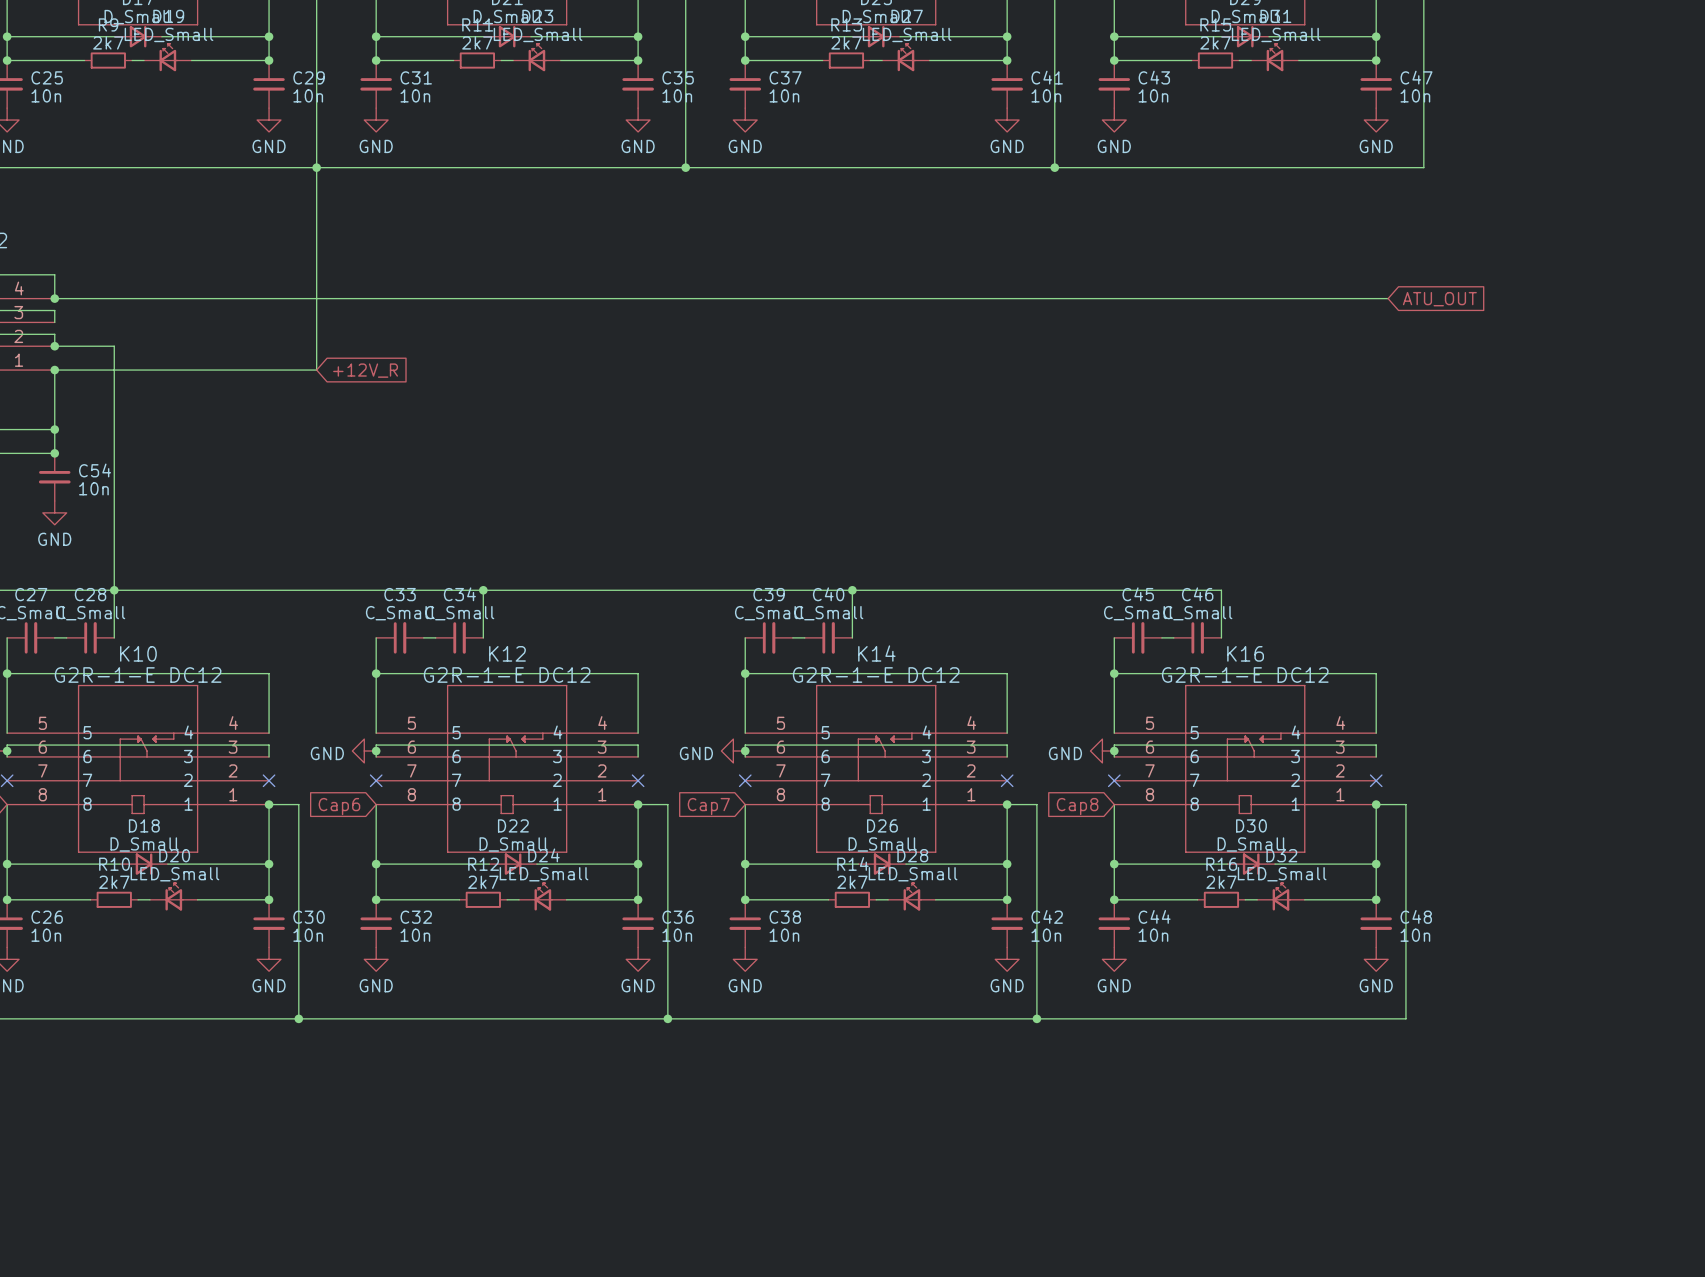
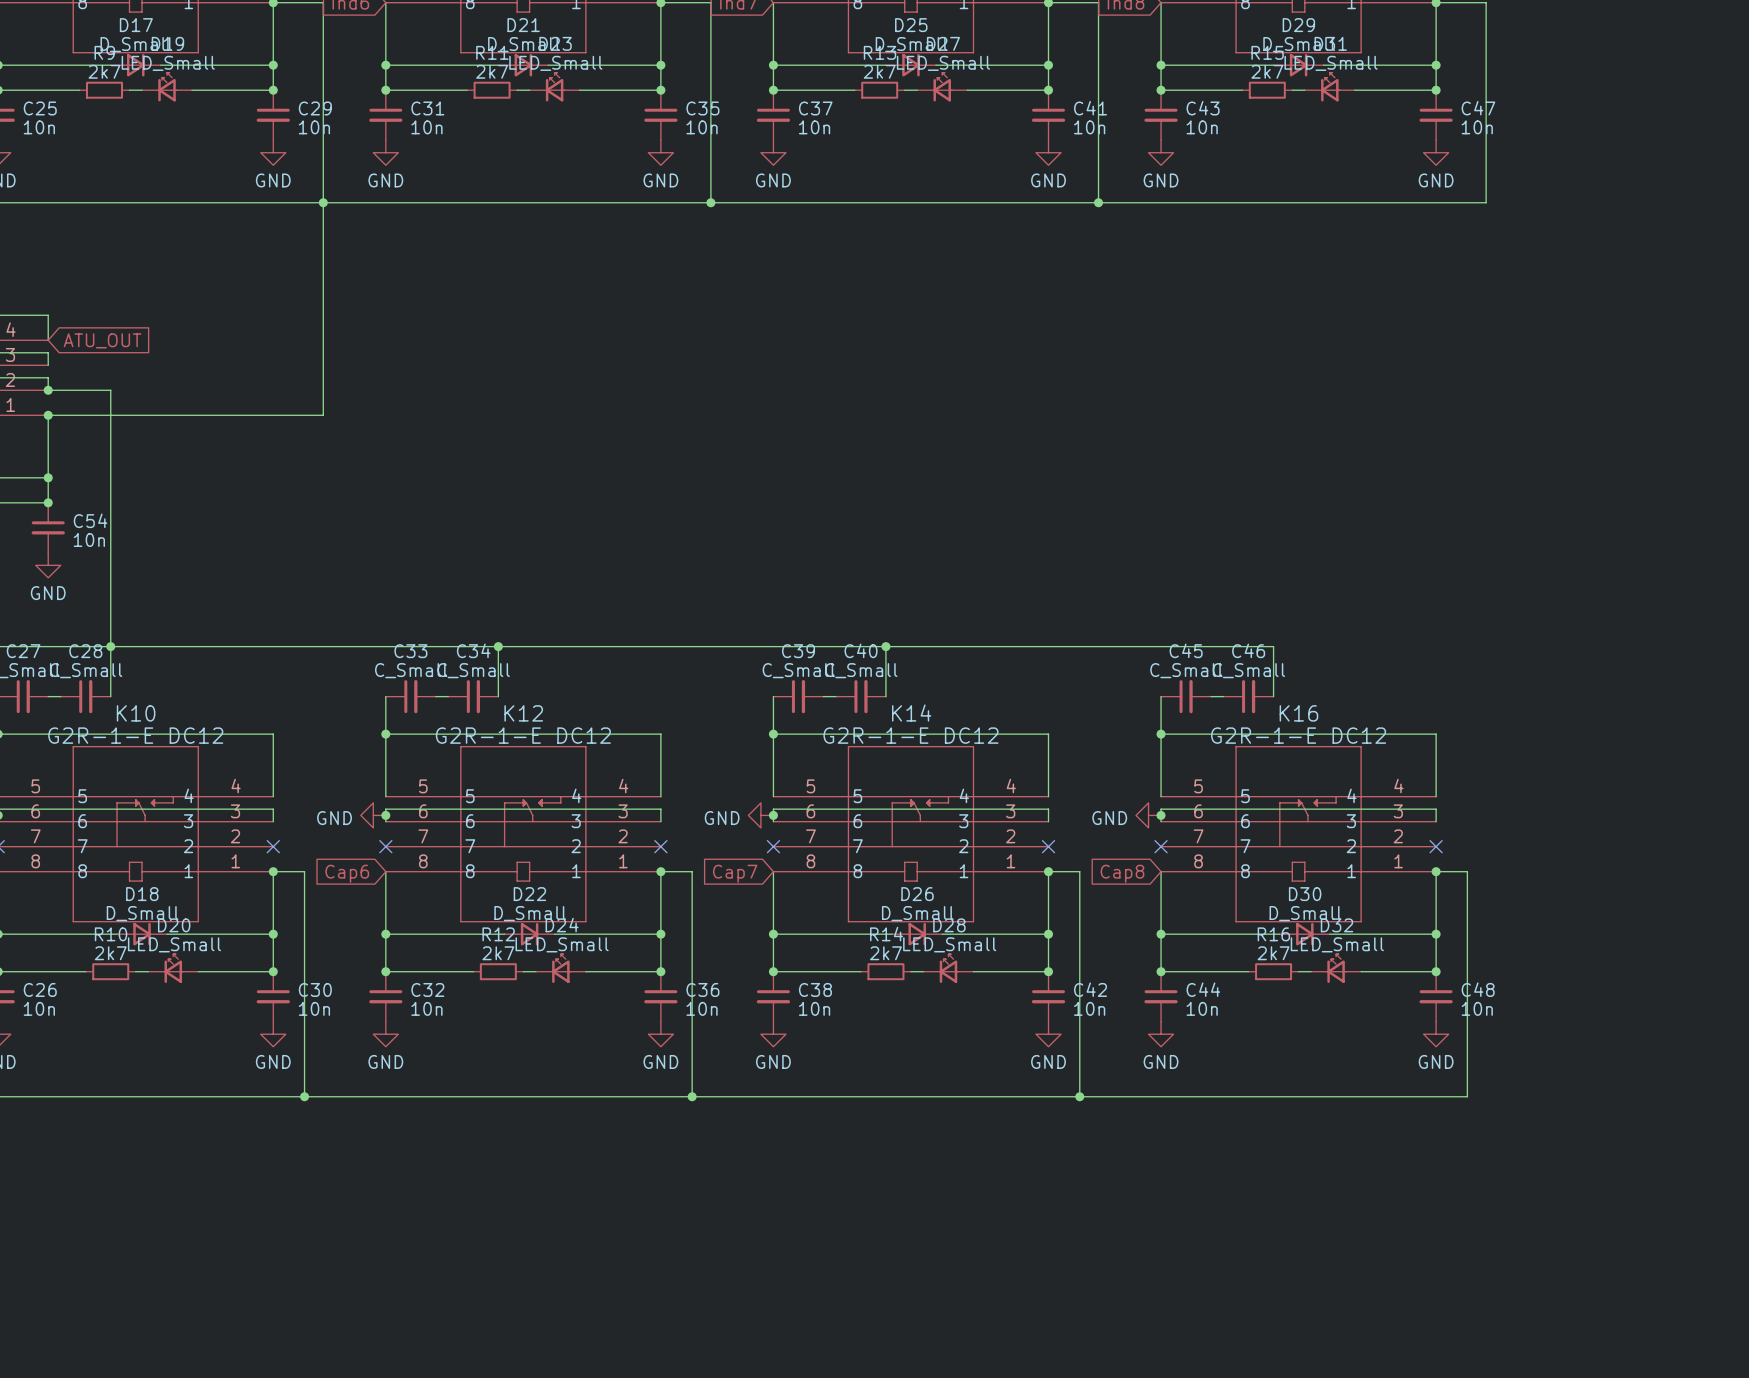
wire: (54, 298) (1388, 298) -> none
junction: (54, 298) -> none
global label: none -> ATU_OUT (102, 340)
global label: ATU_OUT (1439, 299) -> none
global label: +12V_R (365, 370) -> none

